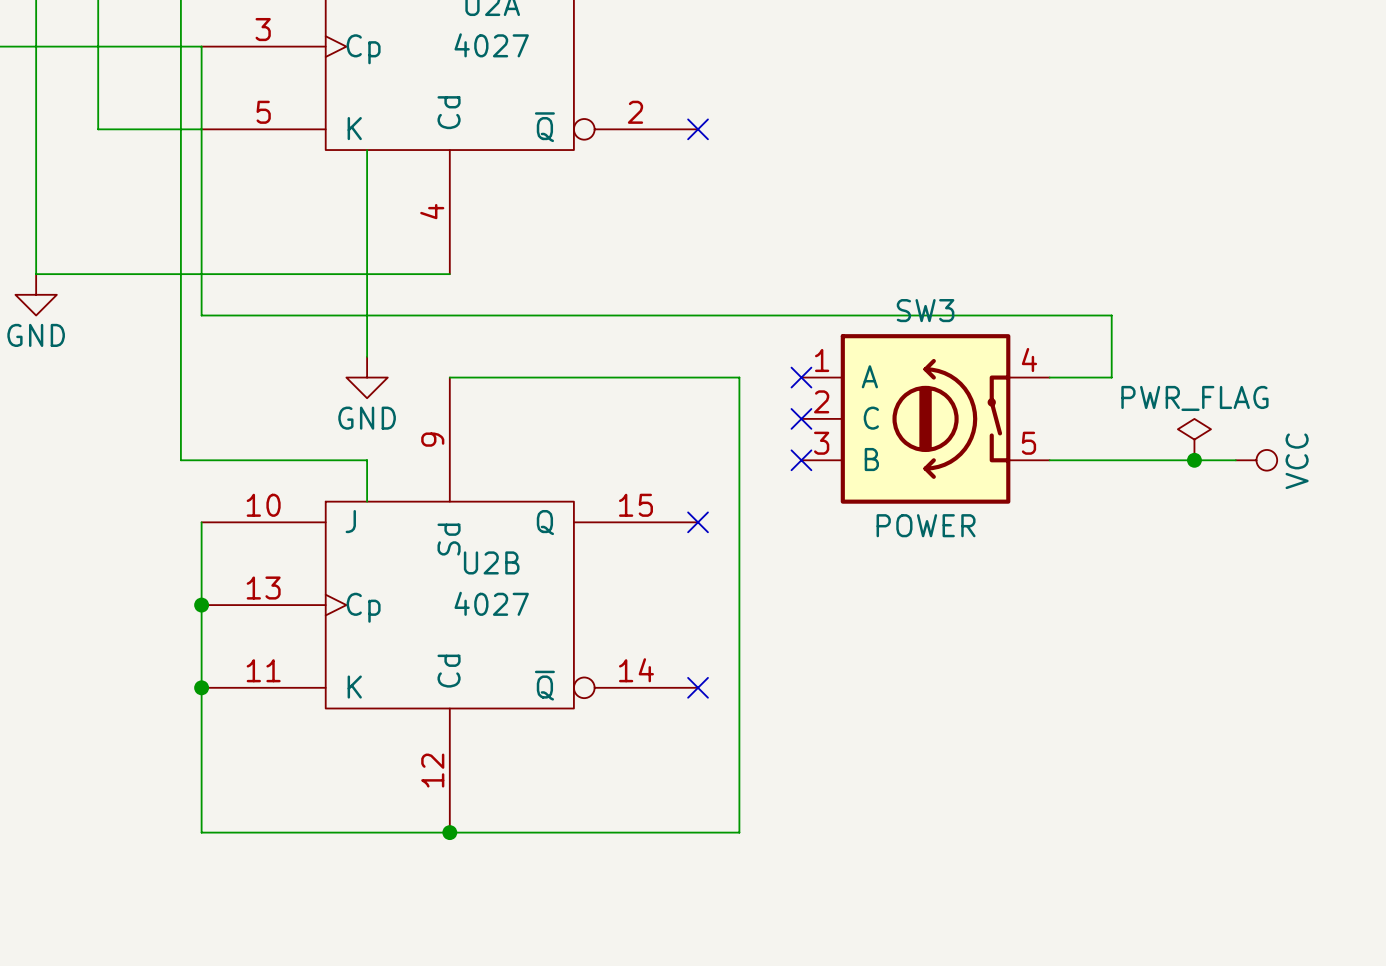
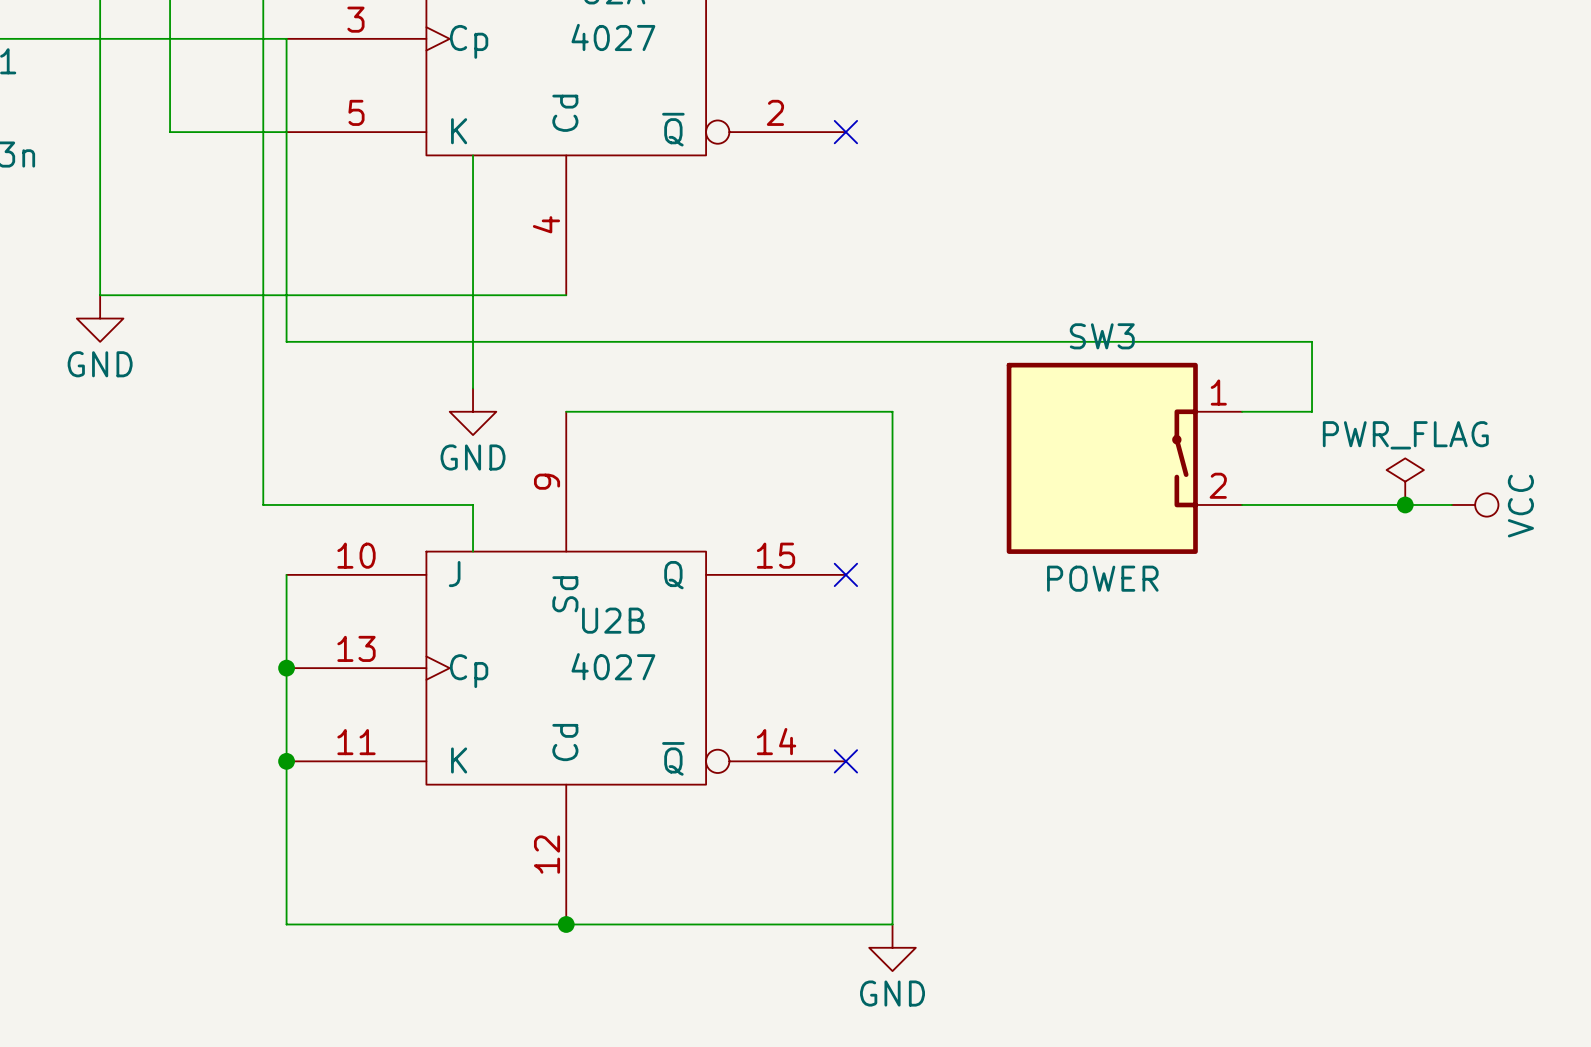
SW3 symbol: [801, 334, 1050, 504] -> [1006, 362, 1243, 554]
no-connect mark: (801, 377) -> none
no-connect mark: (801, 418) -> none
no-connect mark: (801, 460) -> none
power symbol: none -> GND (892, 947)

